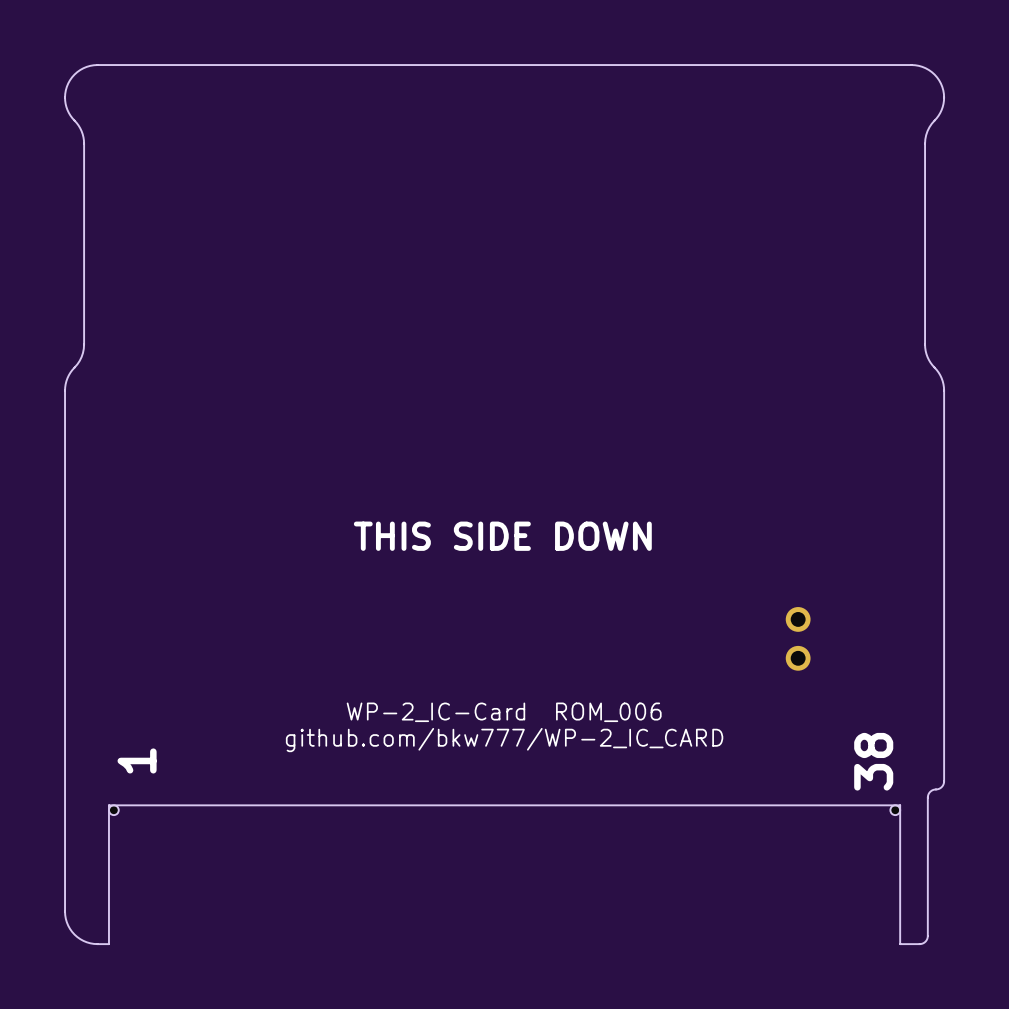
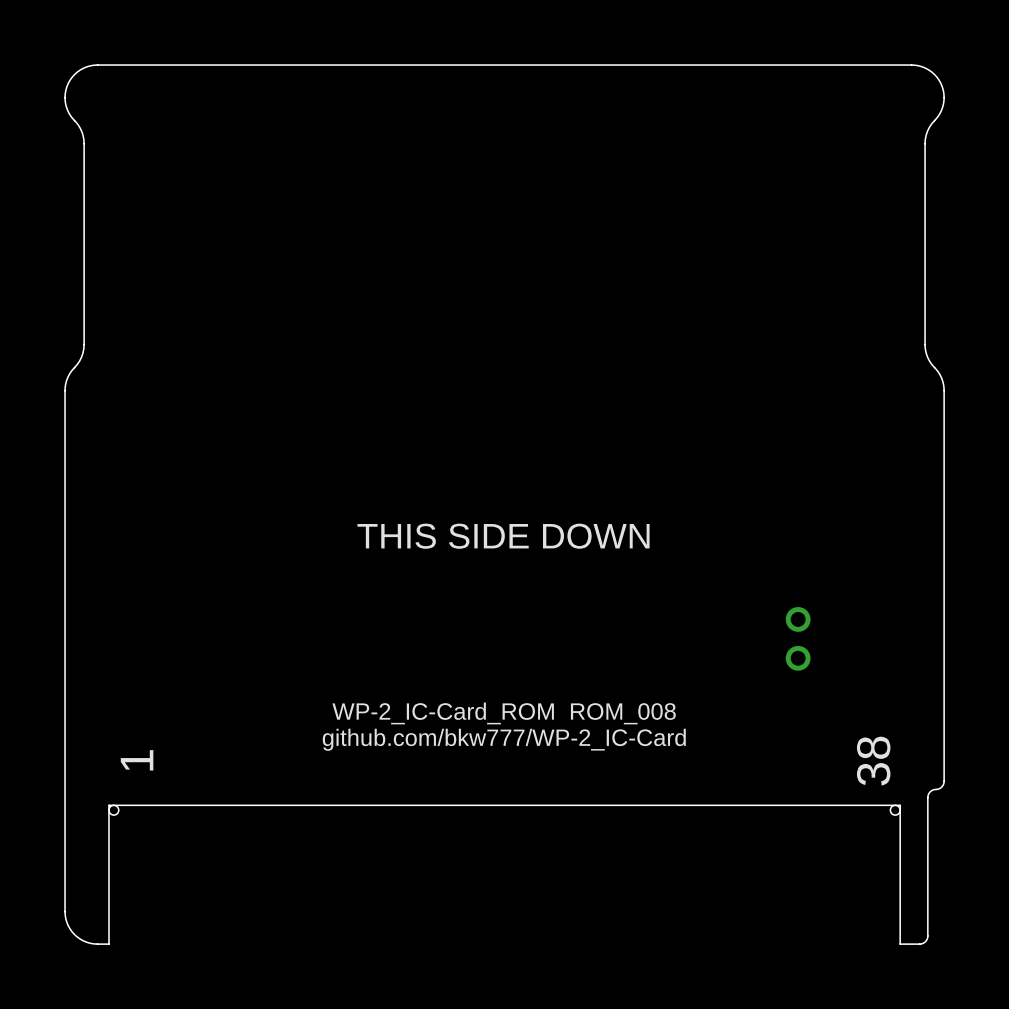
text: WP-2_IC-Card ROM_006 (504, 712) -> WP-2_IC-Card_ROM ROM_008 (504, 713)
text: github.com/bkw777/WP-2_IC_CARD (504, 740) -> github.com/bkw777/WP-2_IC-Card (504, 739)

